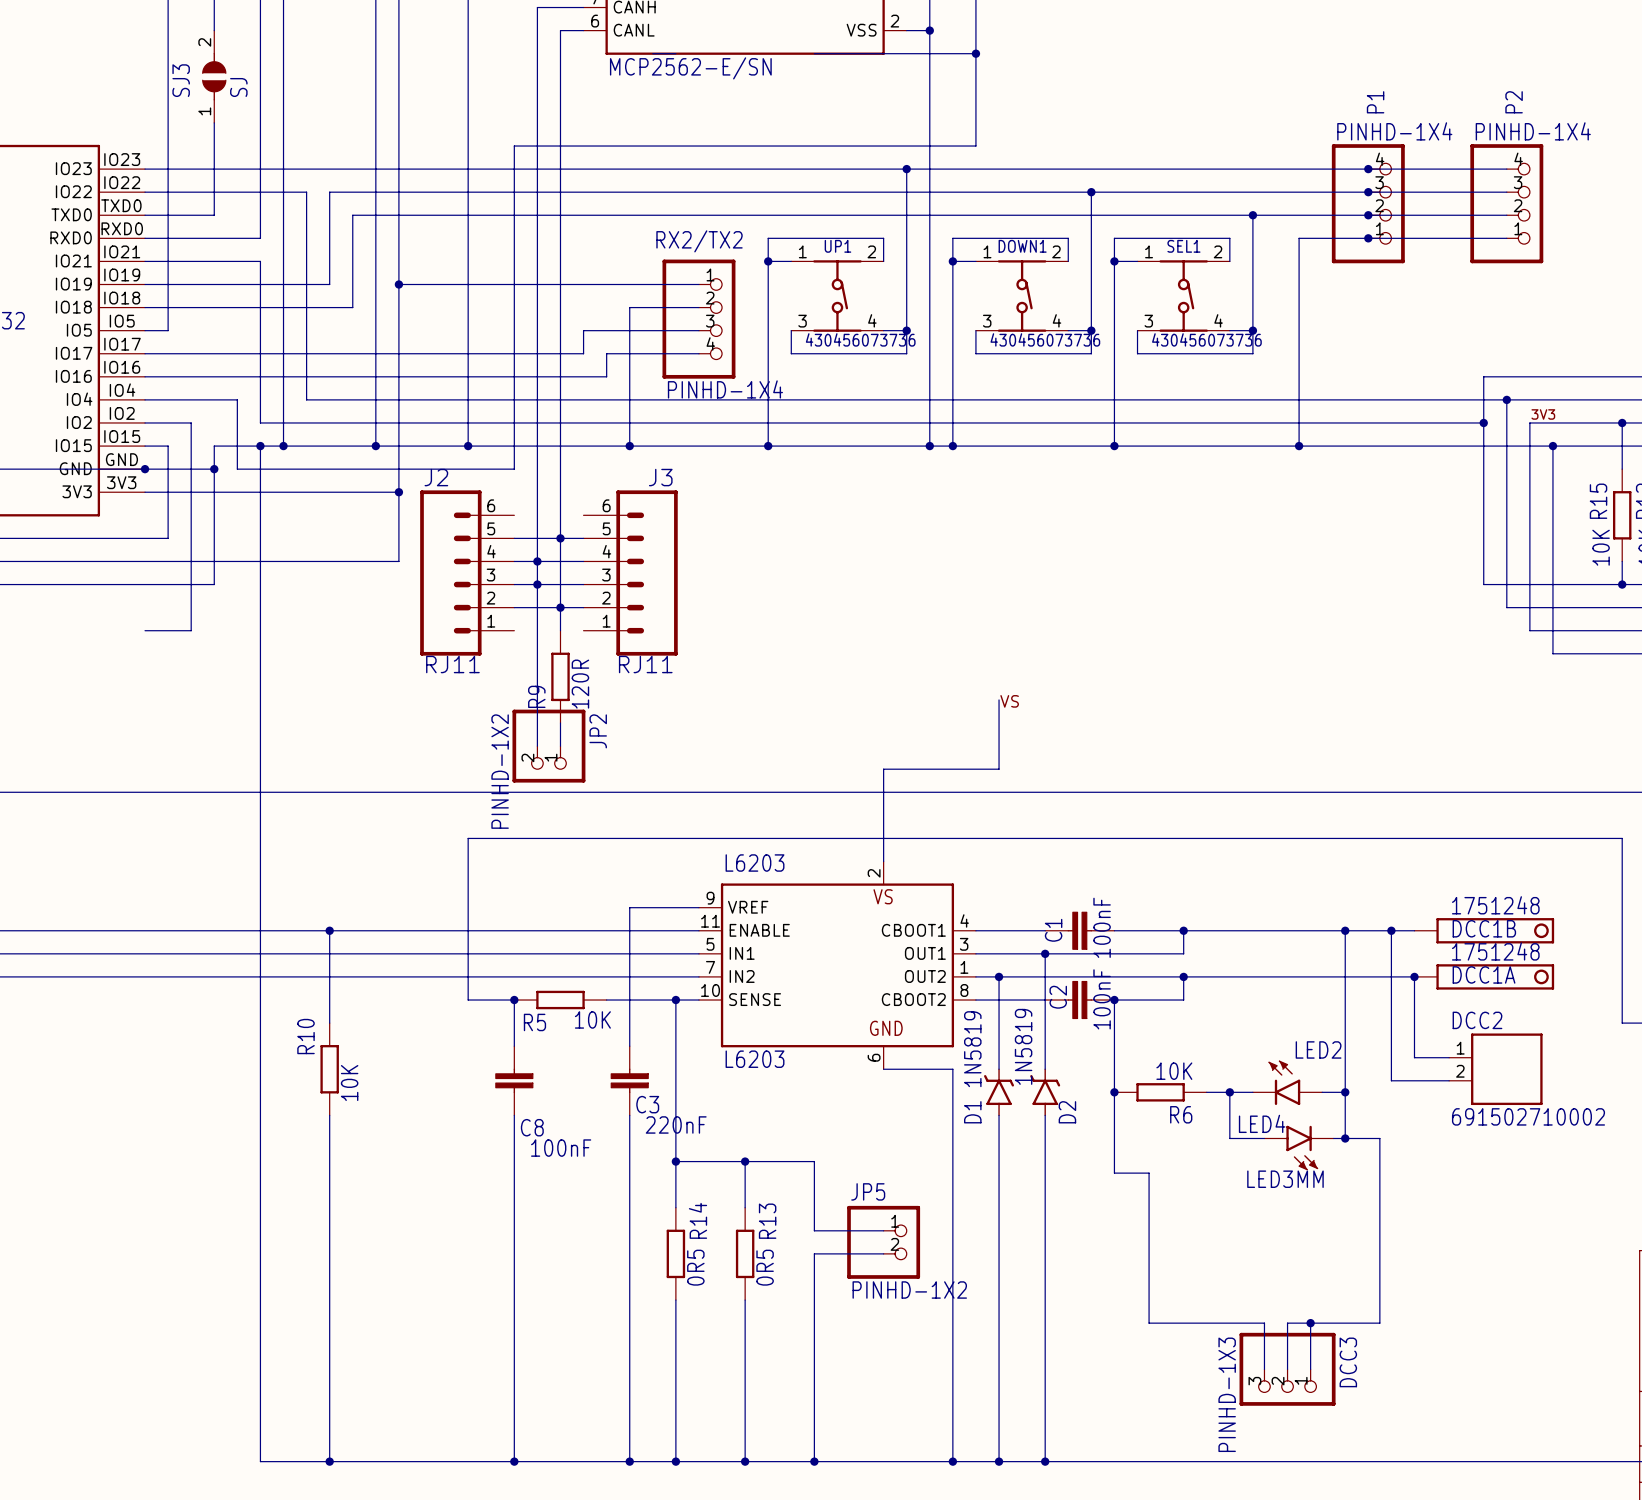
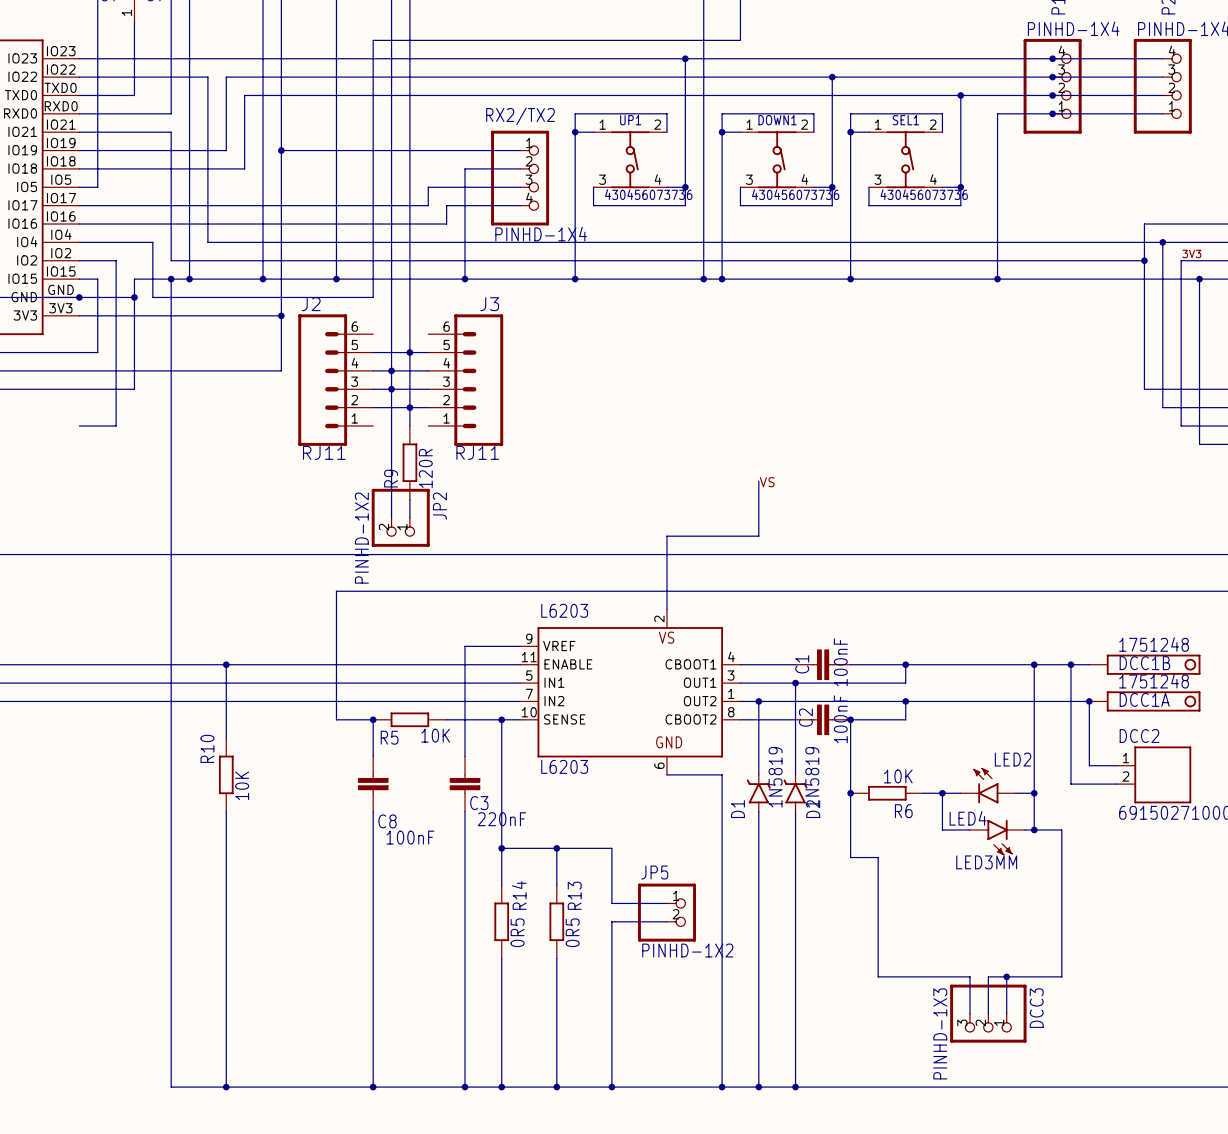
D2 value position: 1N5819 (1023, 1046) -> 1N5819 (812, 777)
D1 value position: 1N5819 (972, 1049) -> 1N5819 (775, 777)

